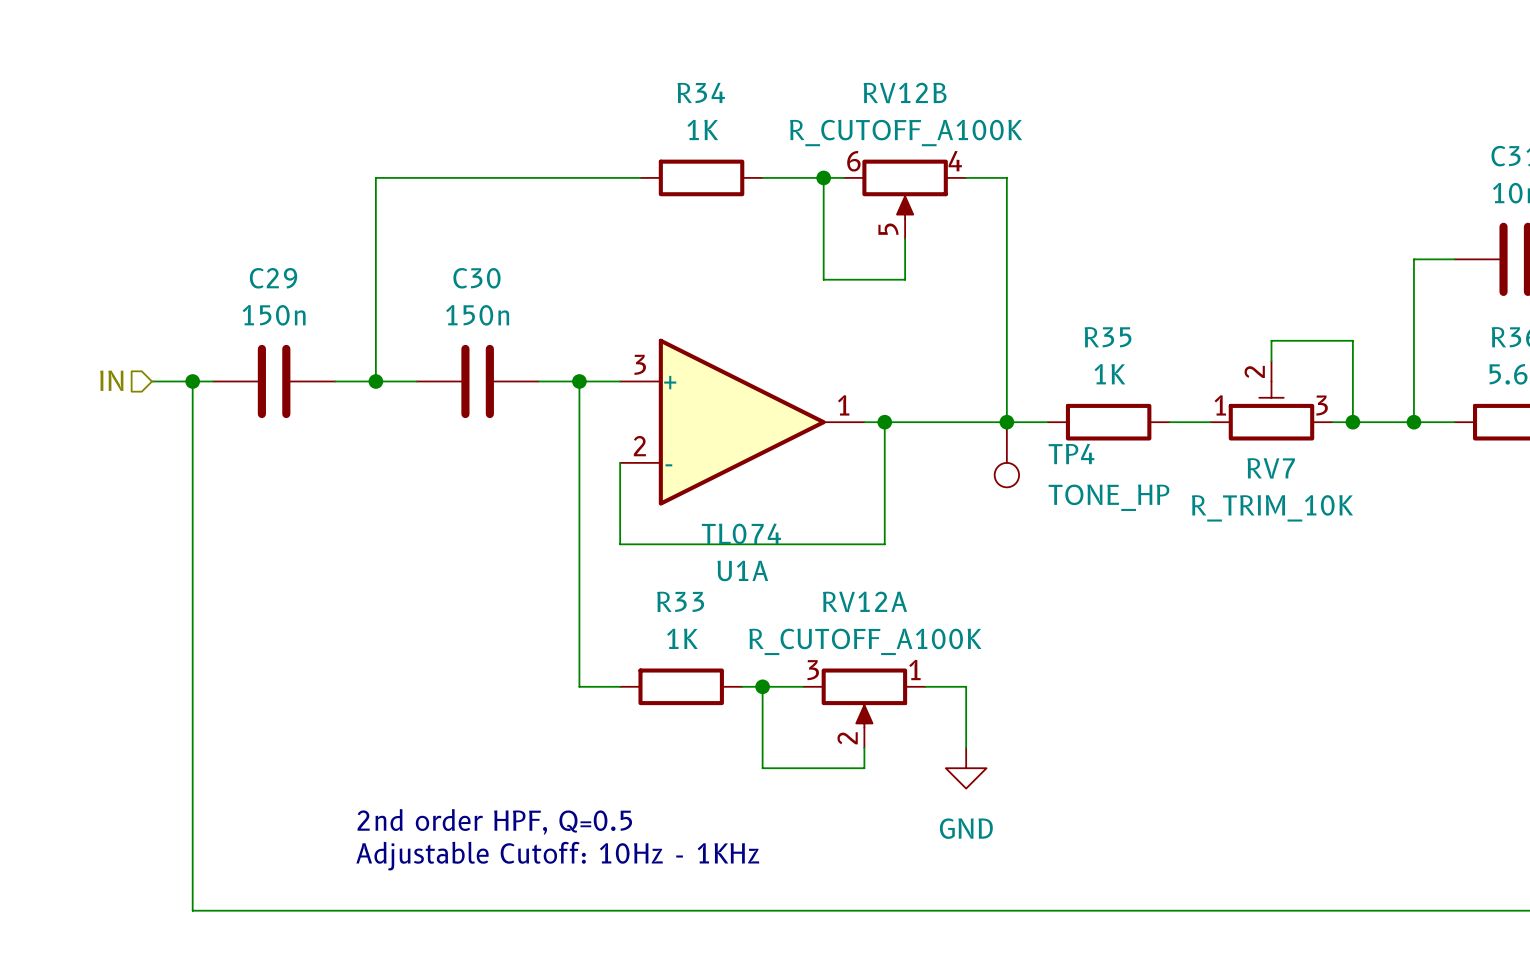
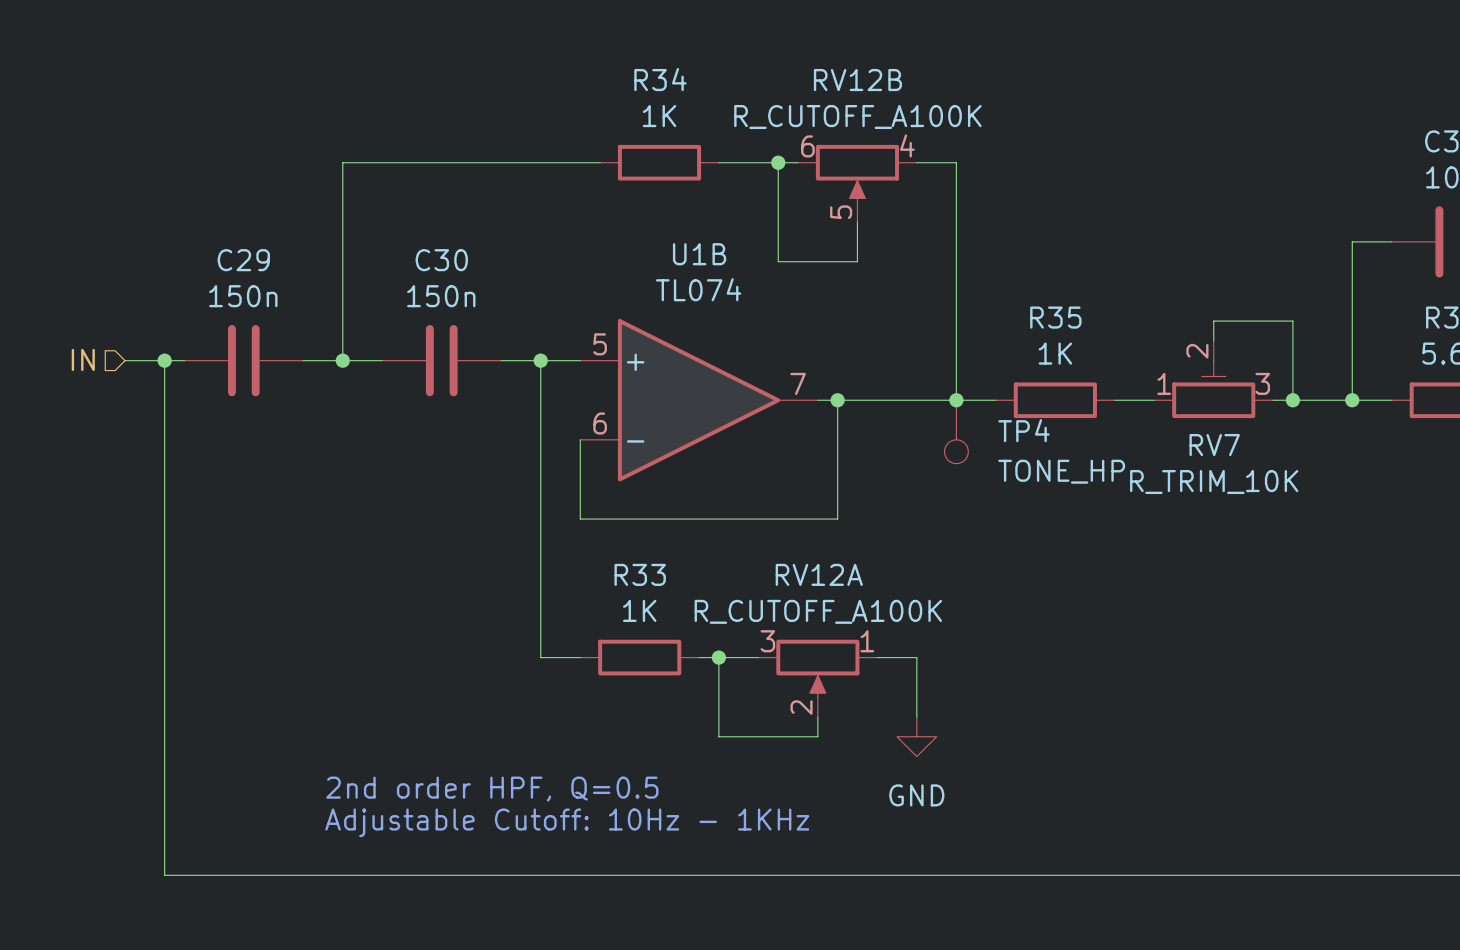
U1A pin number: 3 (640, 364) -> 5 (600, 344)
U1A pin number: 1 (843, 405) -> 7 (798, 383)
U1A pin number: 2 (639, 446) -> 6 (600, 423)
U1A value position: TL074 (741, 533) -> TL074 (698, 289)
U1A name: U1A (742, 570) -> U1B (699, 254)

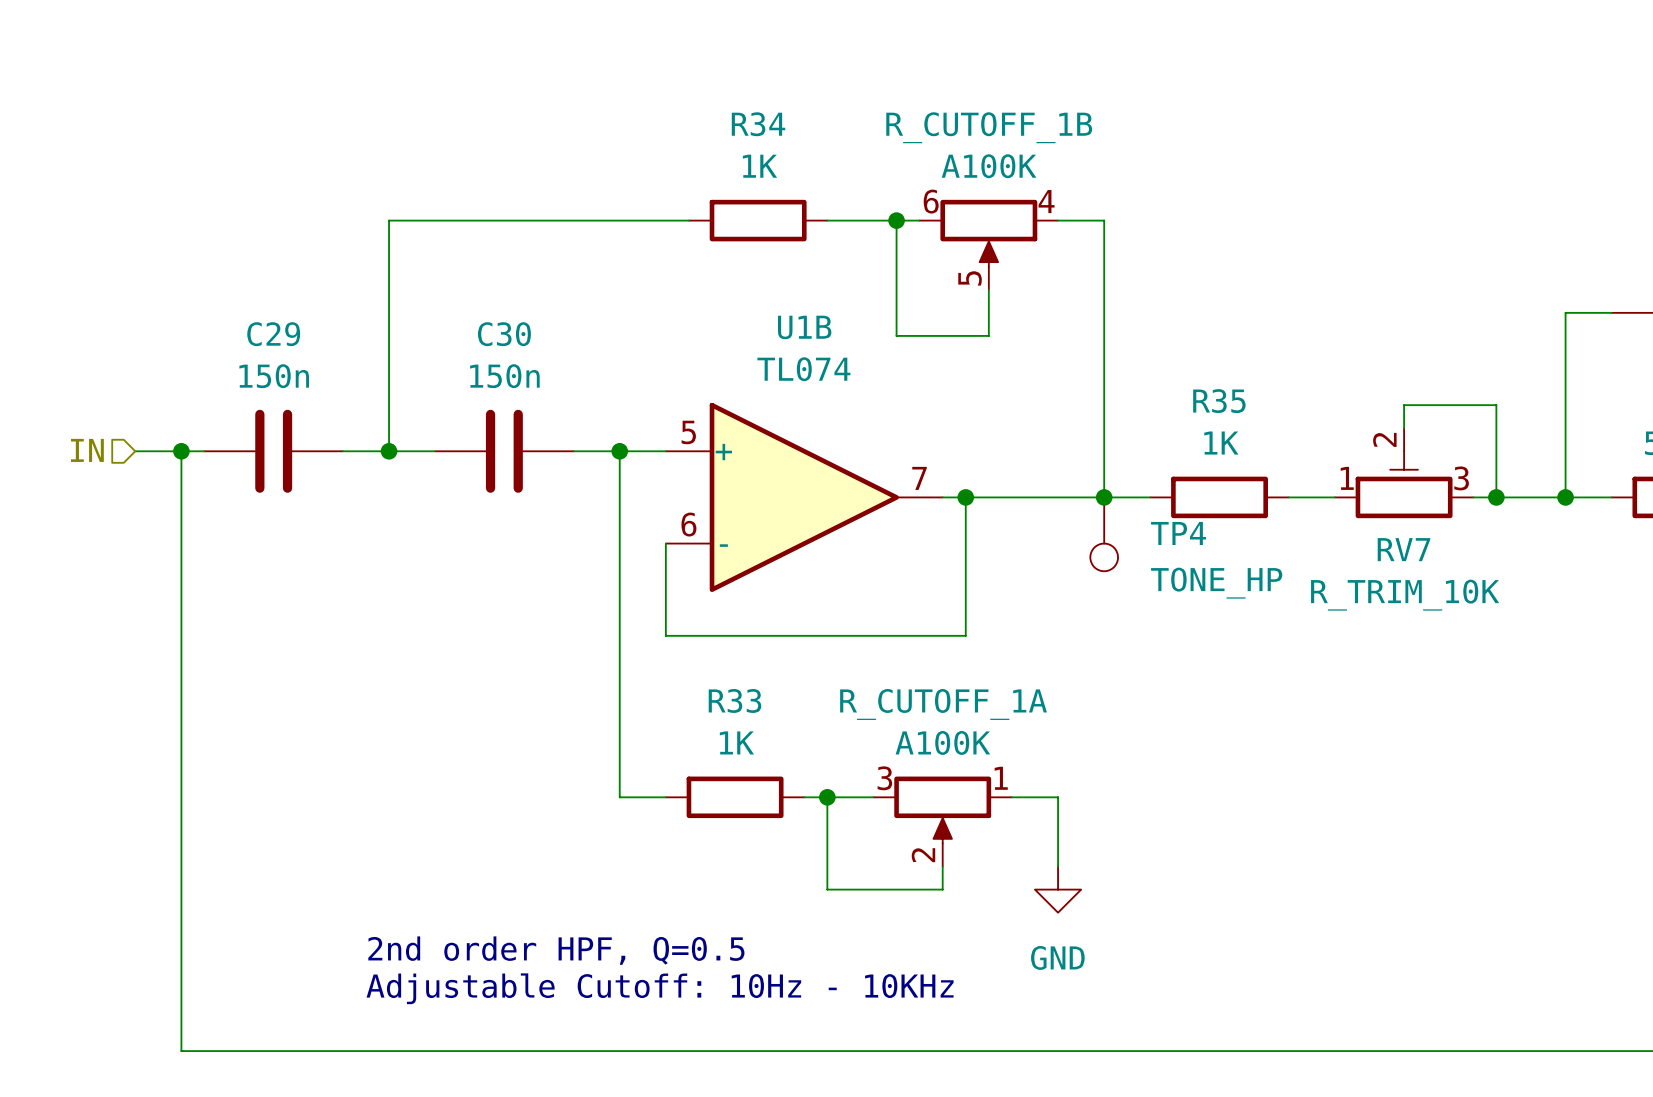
RV12B name: RV12B (857, 80) -> R_CUTOFF_1B (989, 127)
RV12B value: R_CUTOFF_A100K (857, 117) -> A100K (989, 166)
RV12A name: RV12A (819, 574) -> R_CUTOFF_1A (943, 704)
RV12A value: R_CUTOFF_A100K (818, 611) -> A100K (942, 742)
text: Adjustable Cutoff: 10Hz - 1KHz (567, 822) -> Adjustable Cutoff: 10Hz - 10KHz (660, 988)

